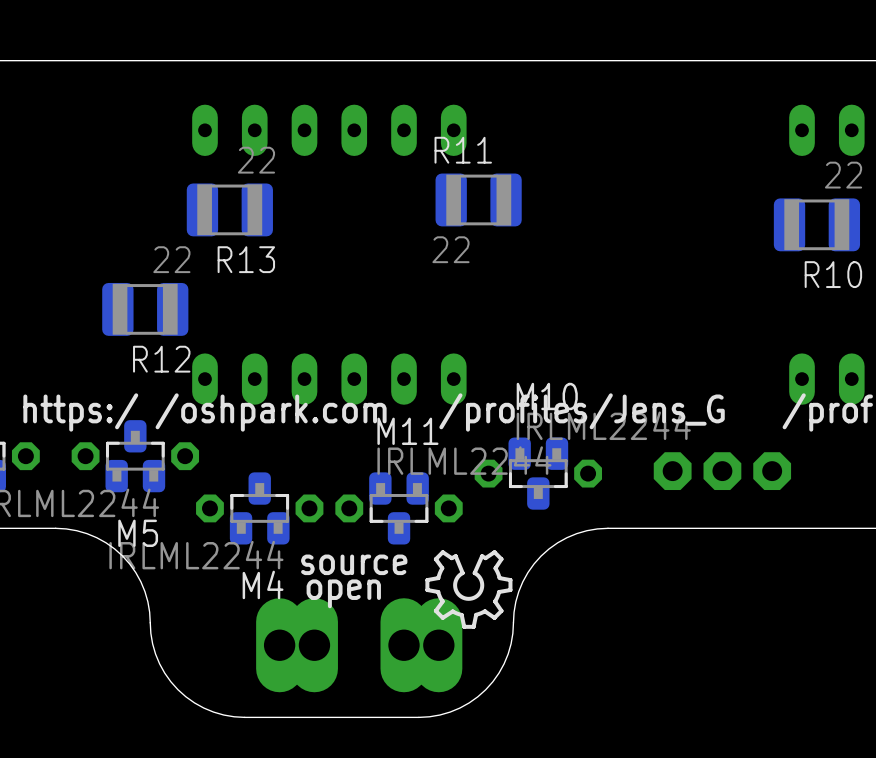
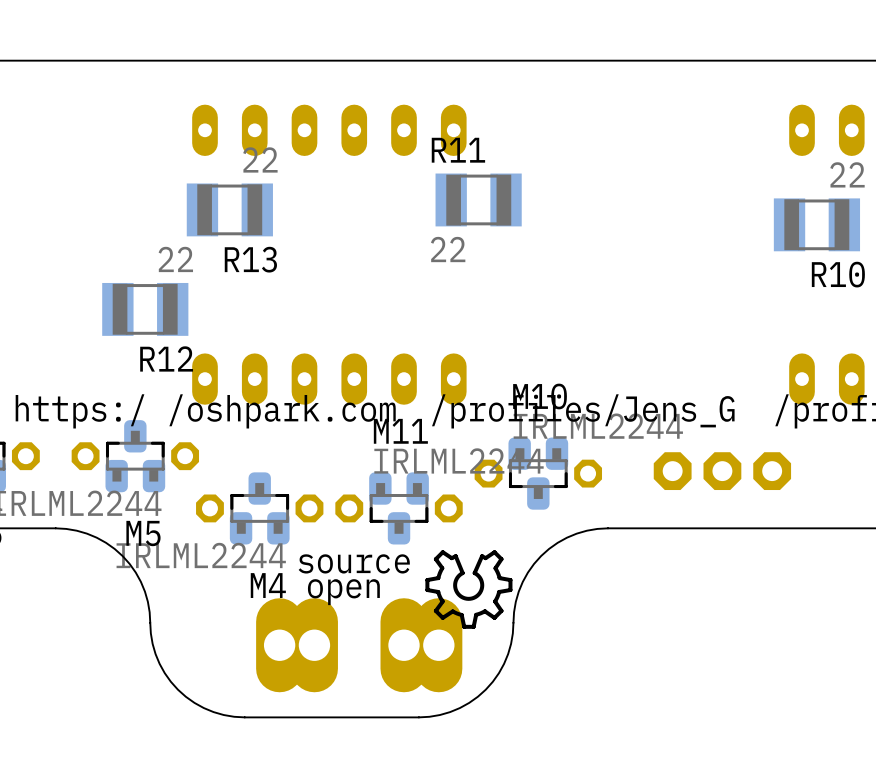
R11 footprint: [435, 173, 522, 227] -> [435, 173, 522, 227]
R13 footprint: [186, 183, 273, 237] -> [186, 183, 273, 237]
R10 footprint: [773, 198, 861, 252] -> [773, 198, 861, 252]
R12 footprint: [102, 282, 189, 336] -> [102, 282, 189, 336]

